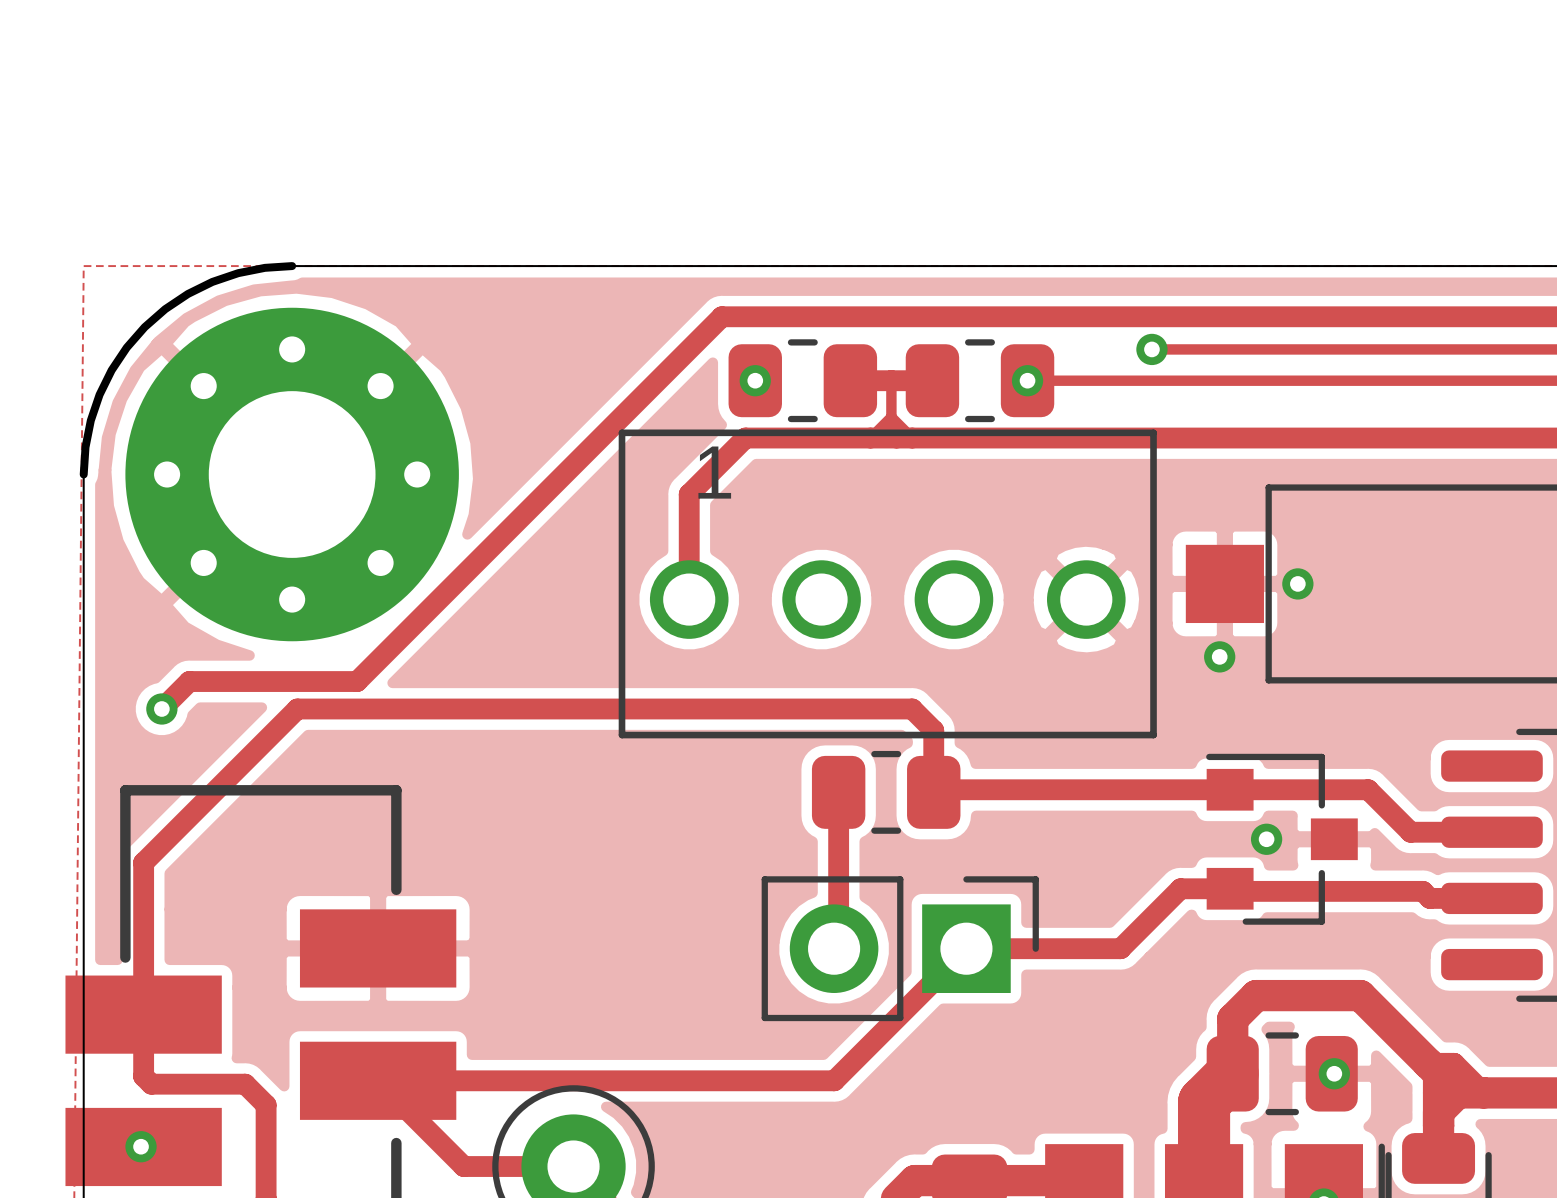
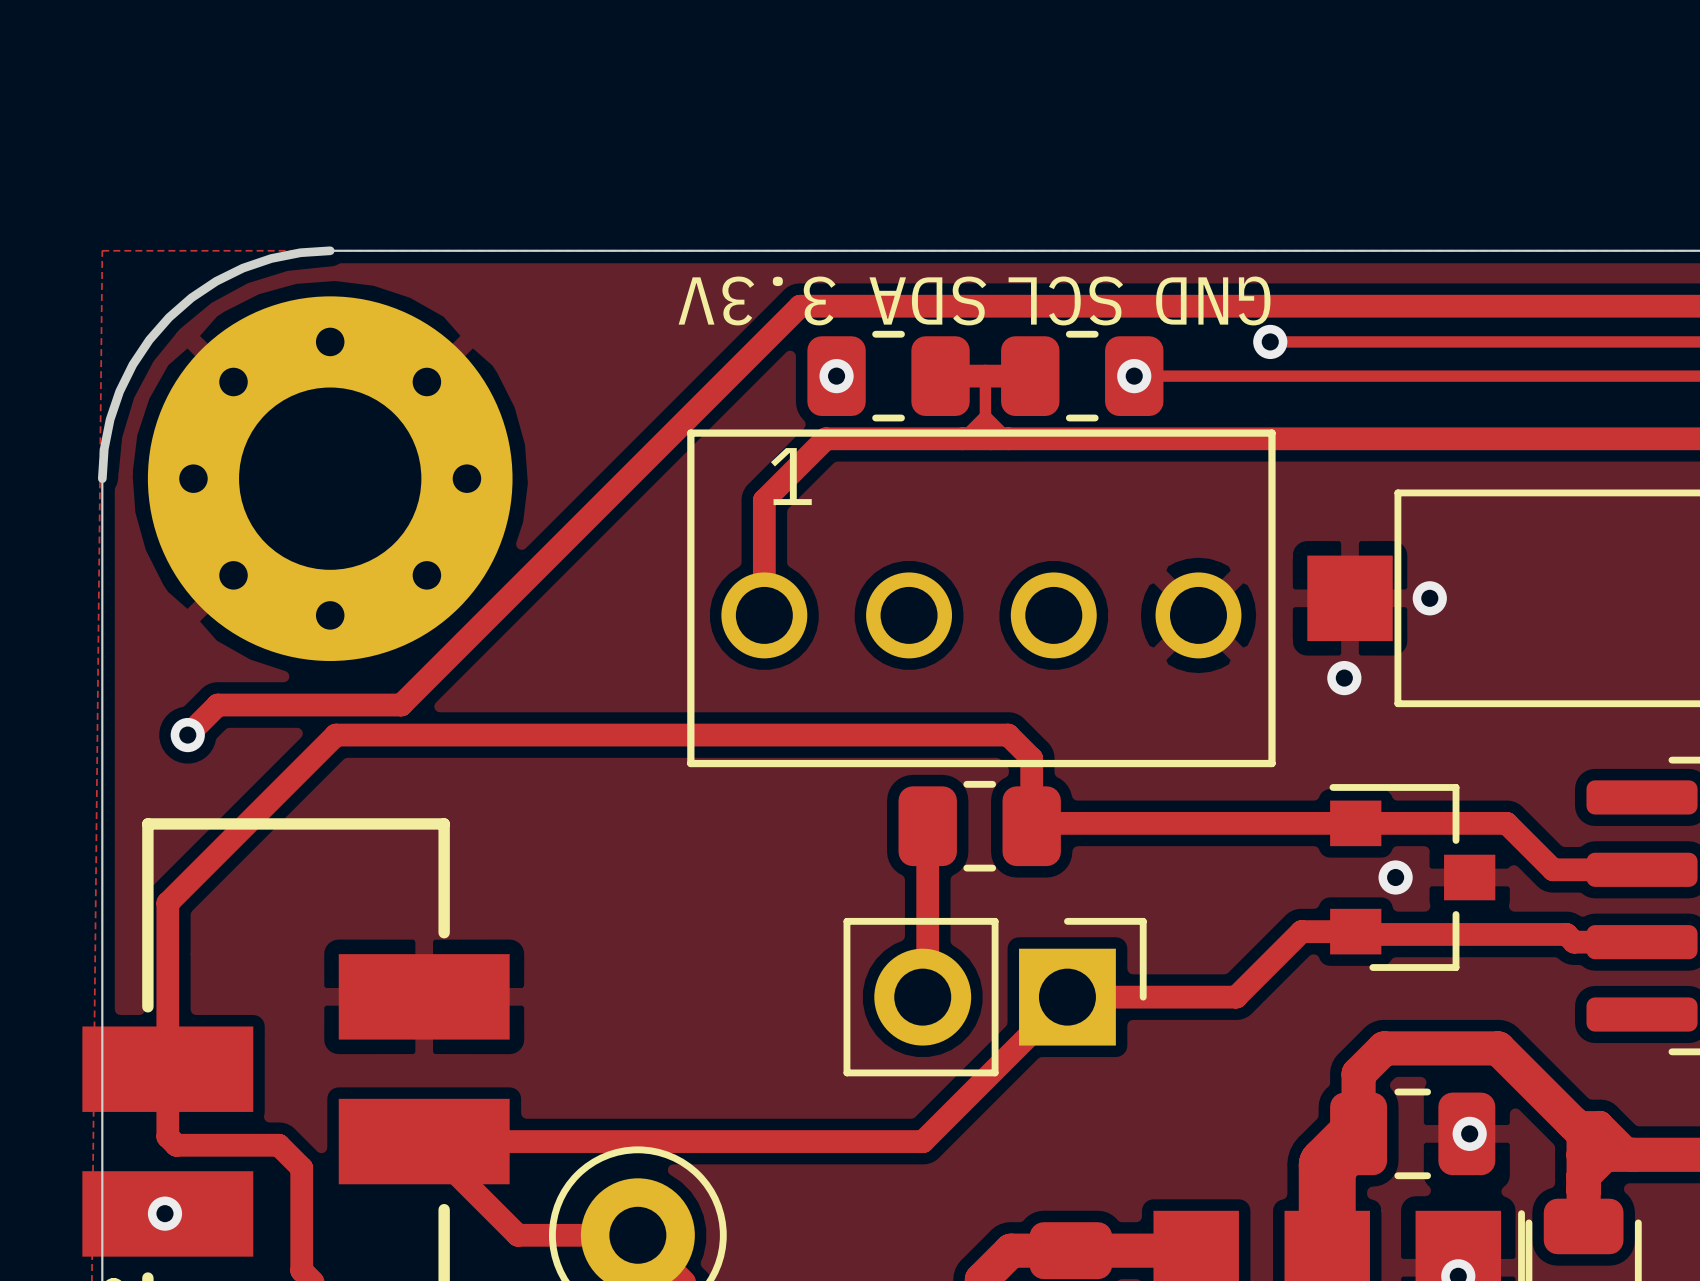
text: none -> 3.3V (757, 300)
text: none -> SDA (927, 300)
text: none -> SCL (1065, 300)
text: none -> GND (1213, 300)

